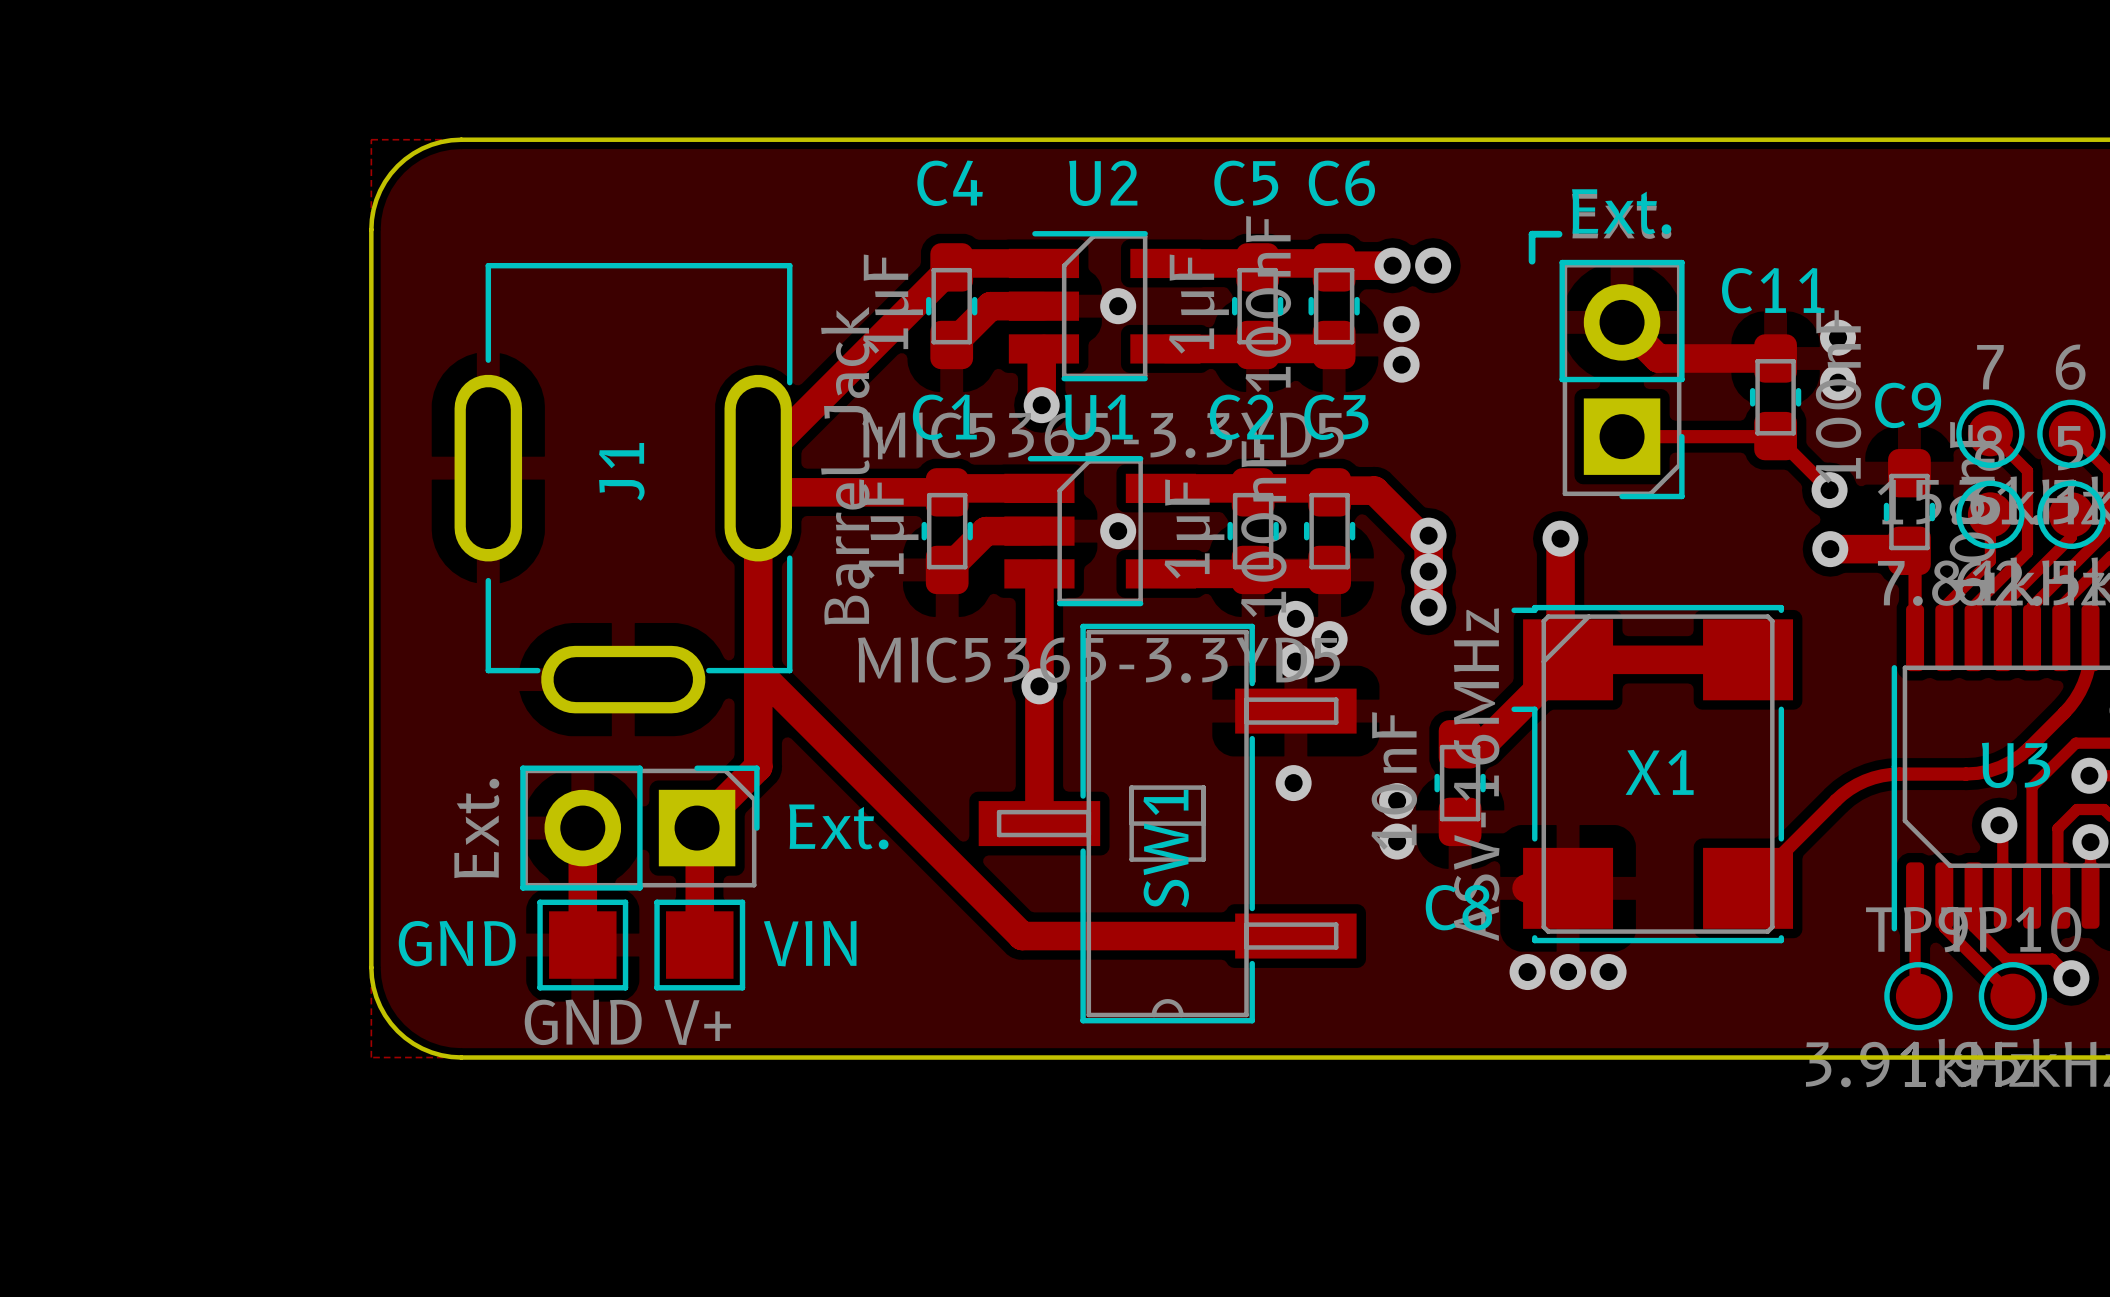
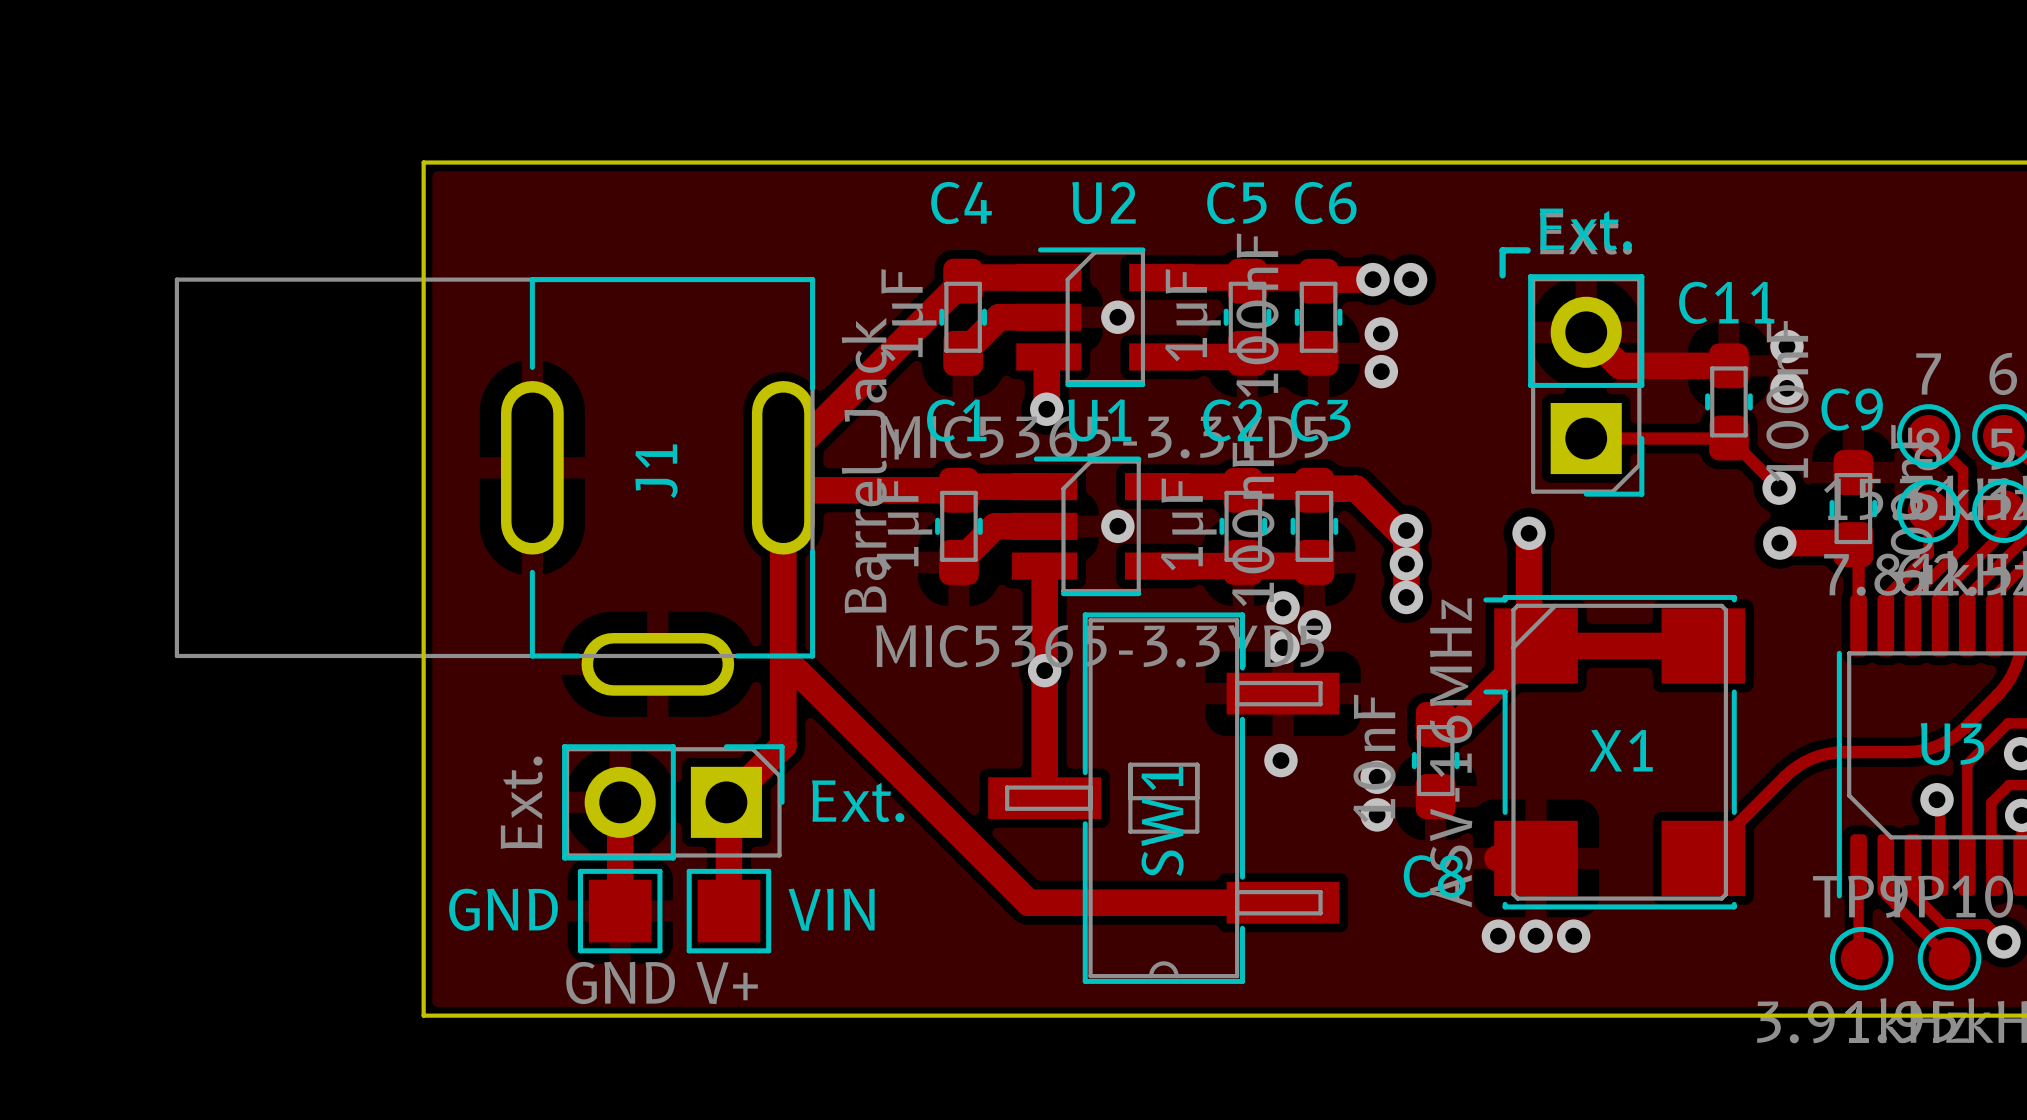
board edge: (461, 139) (431, 144) (413, 153) (397, 166) (385, 181) (376, 199) (371, 229) -> (507, 162) (423, 162) (423, 246)
J1 footprint: [454, 262, 793, 714] -> [174, 277, 816, 696]
board edge: (371, 967) (373, 987) (380, 1006) (397, 1031) (422, 1048) (441, 1055) (461, 1057) -> (423, 932) (423, 1015) (507, 1015)

